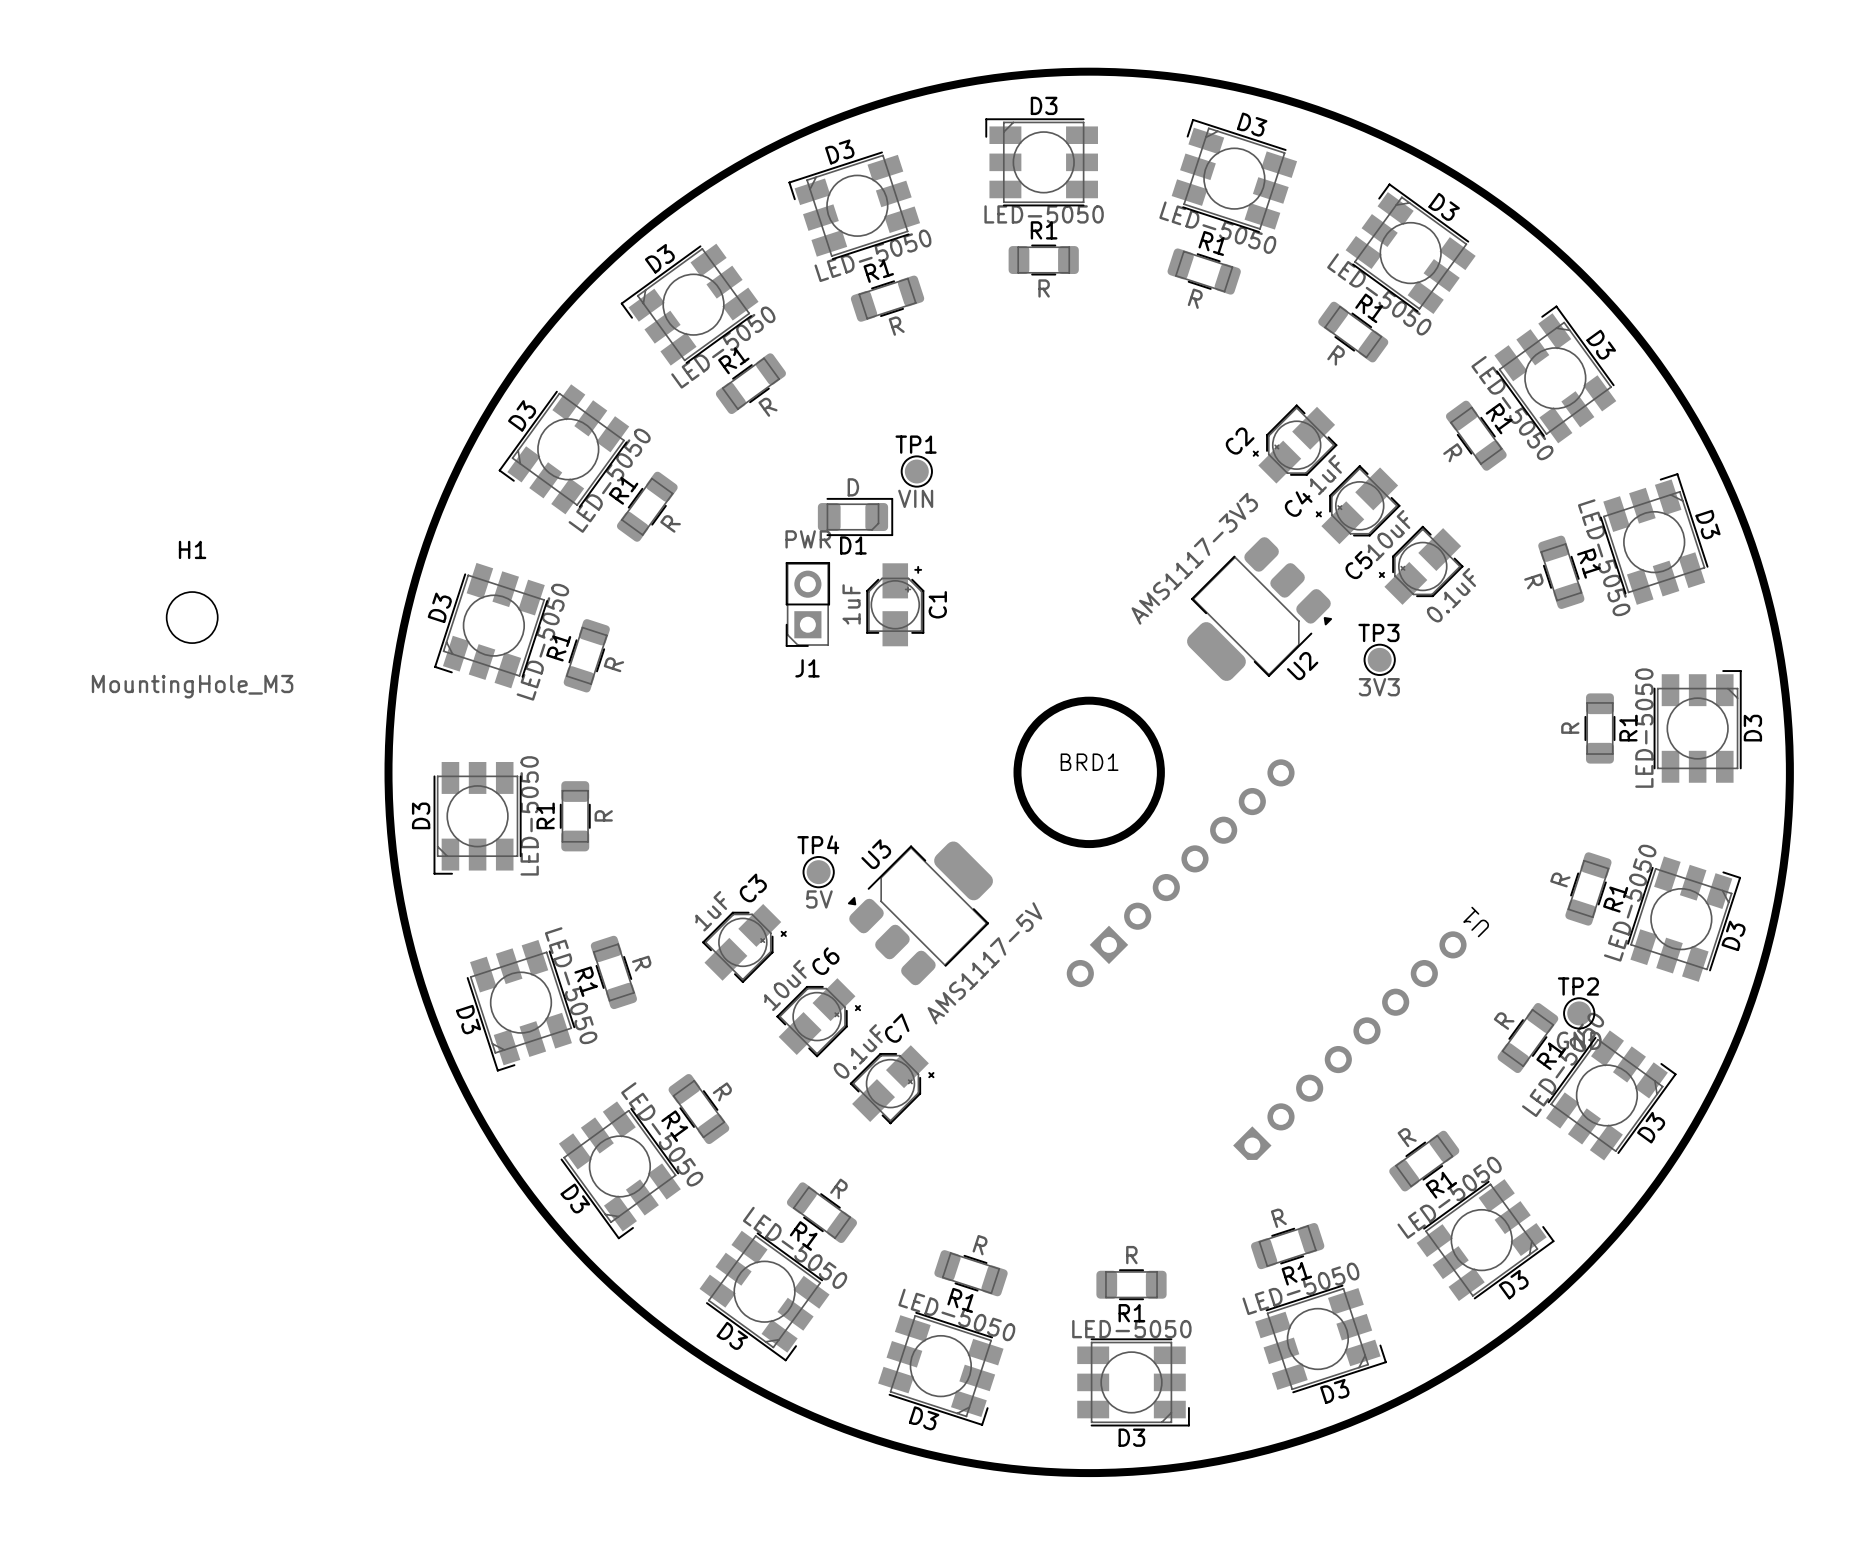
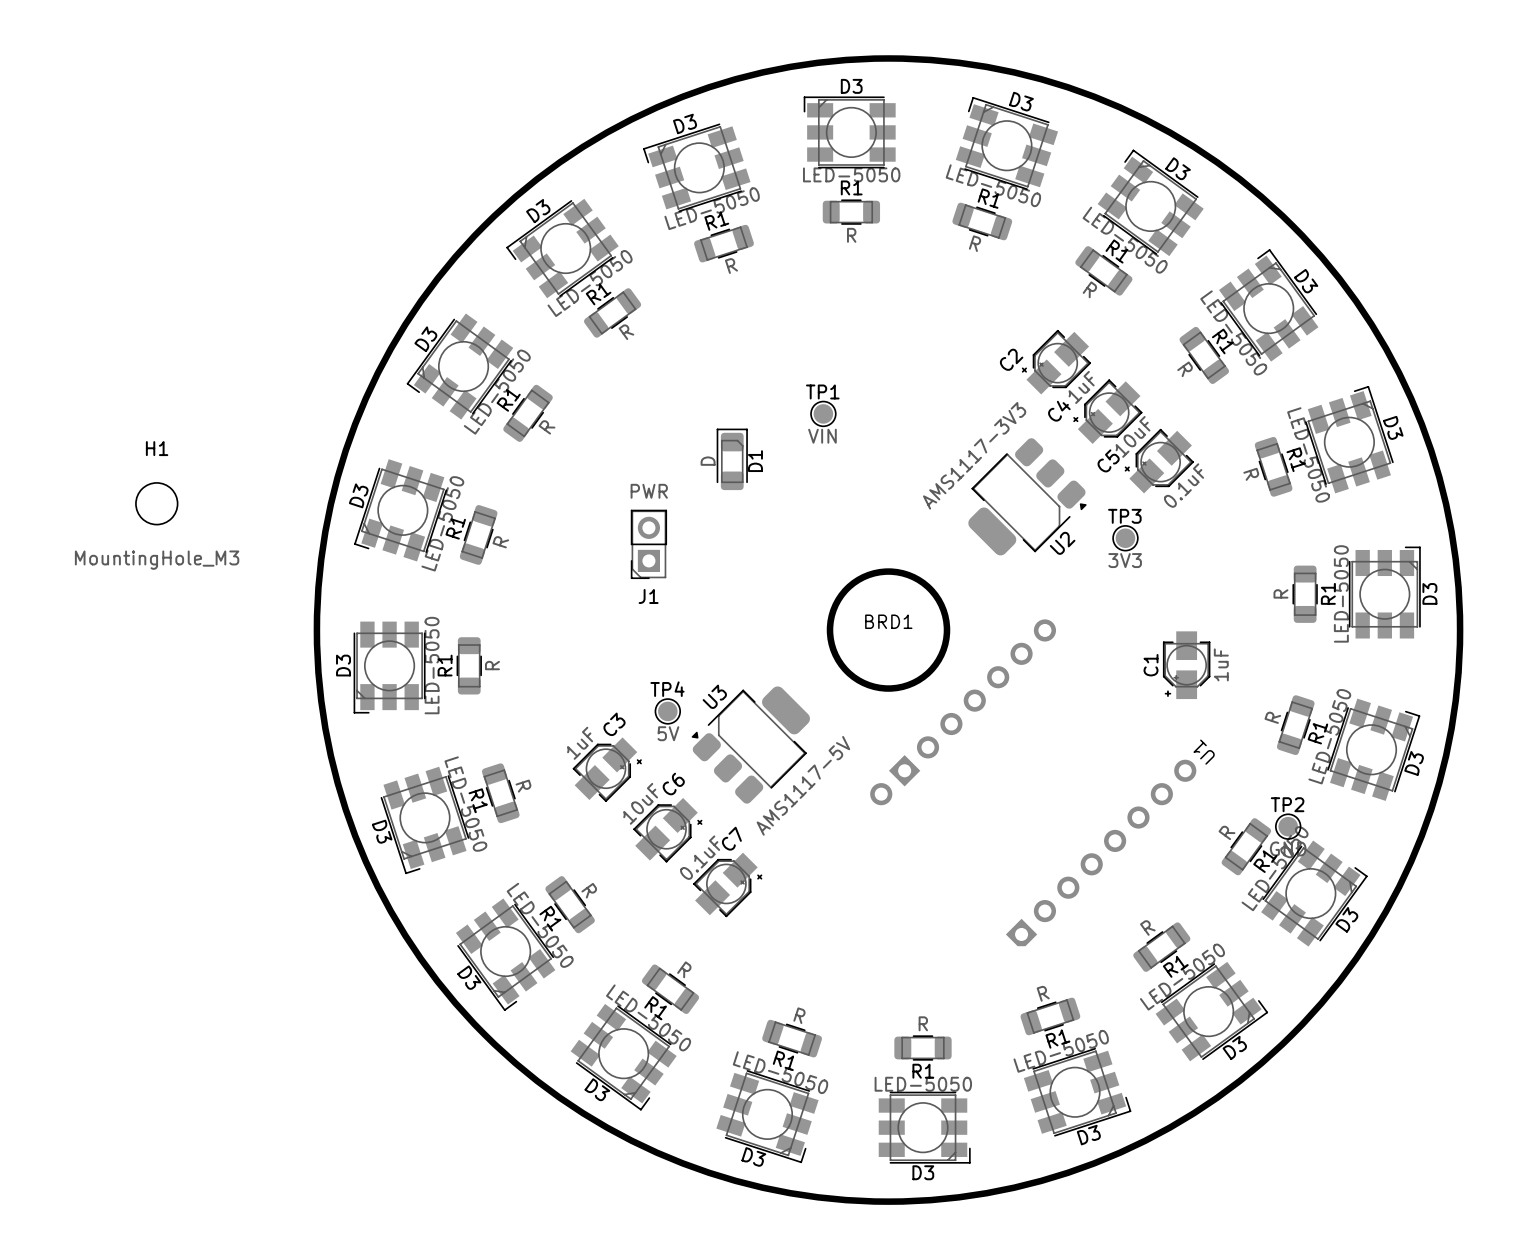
TP1 position: (916, 471) -> (823, 413)
D1 rotation: 0° (855, 517) -> 90° counterclockwise (732, 459)
D1 position: (855, 517) -> (732, 459)
J1 position: (807, 604) -> (648, 544)
C1 rotation: 0° (895, 604) -> 180° (1186, 665)
C1 position: (895, 604) -> (1186, 665)

